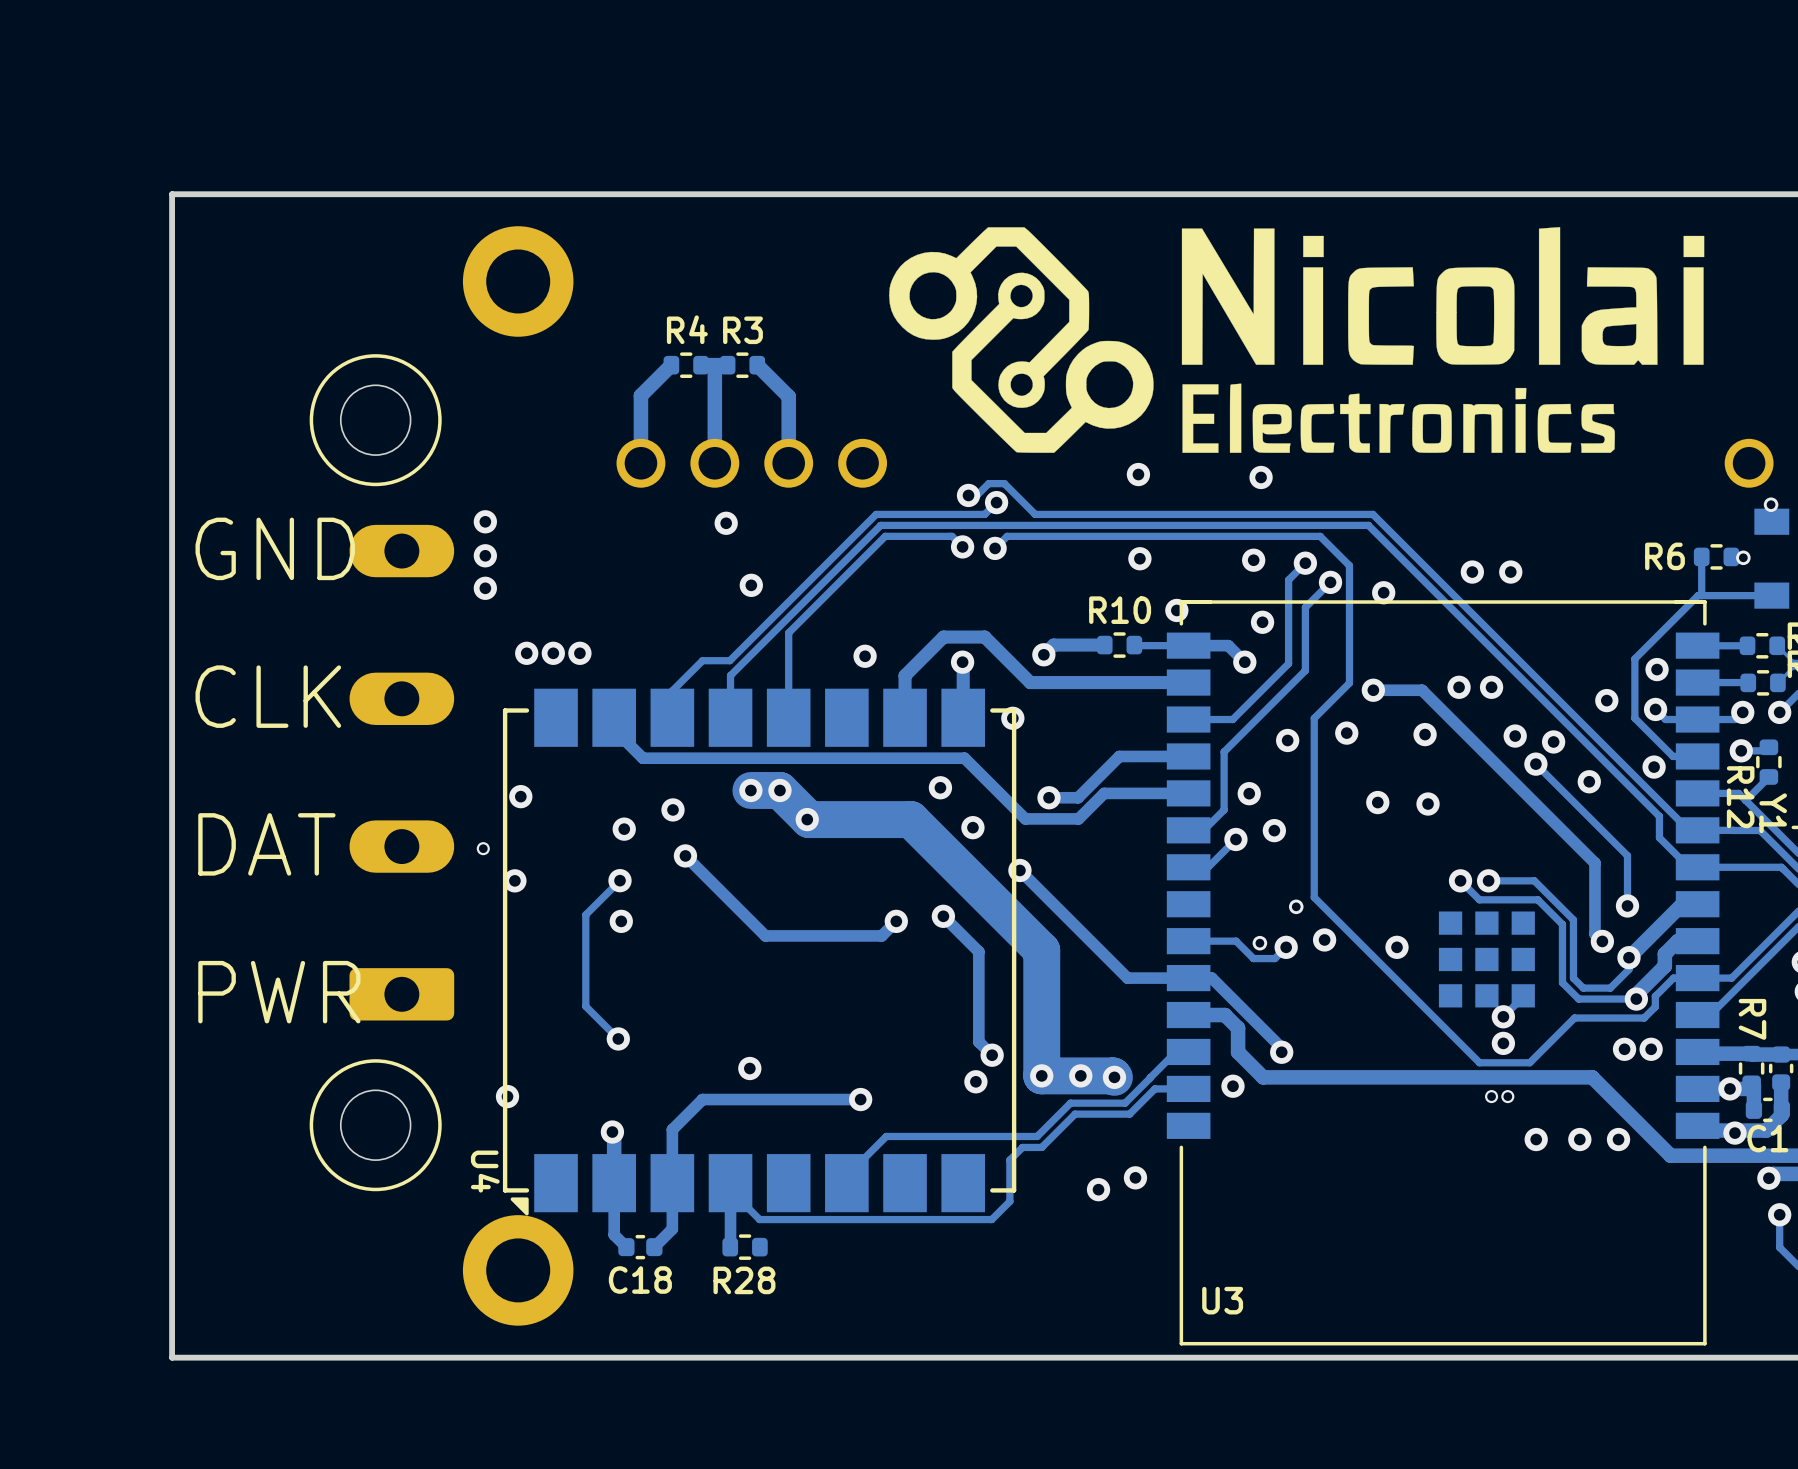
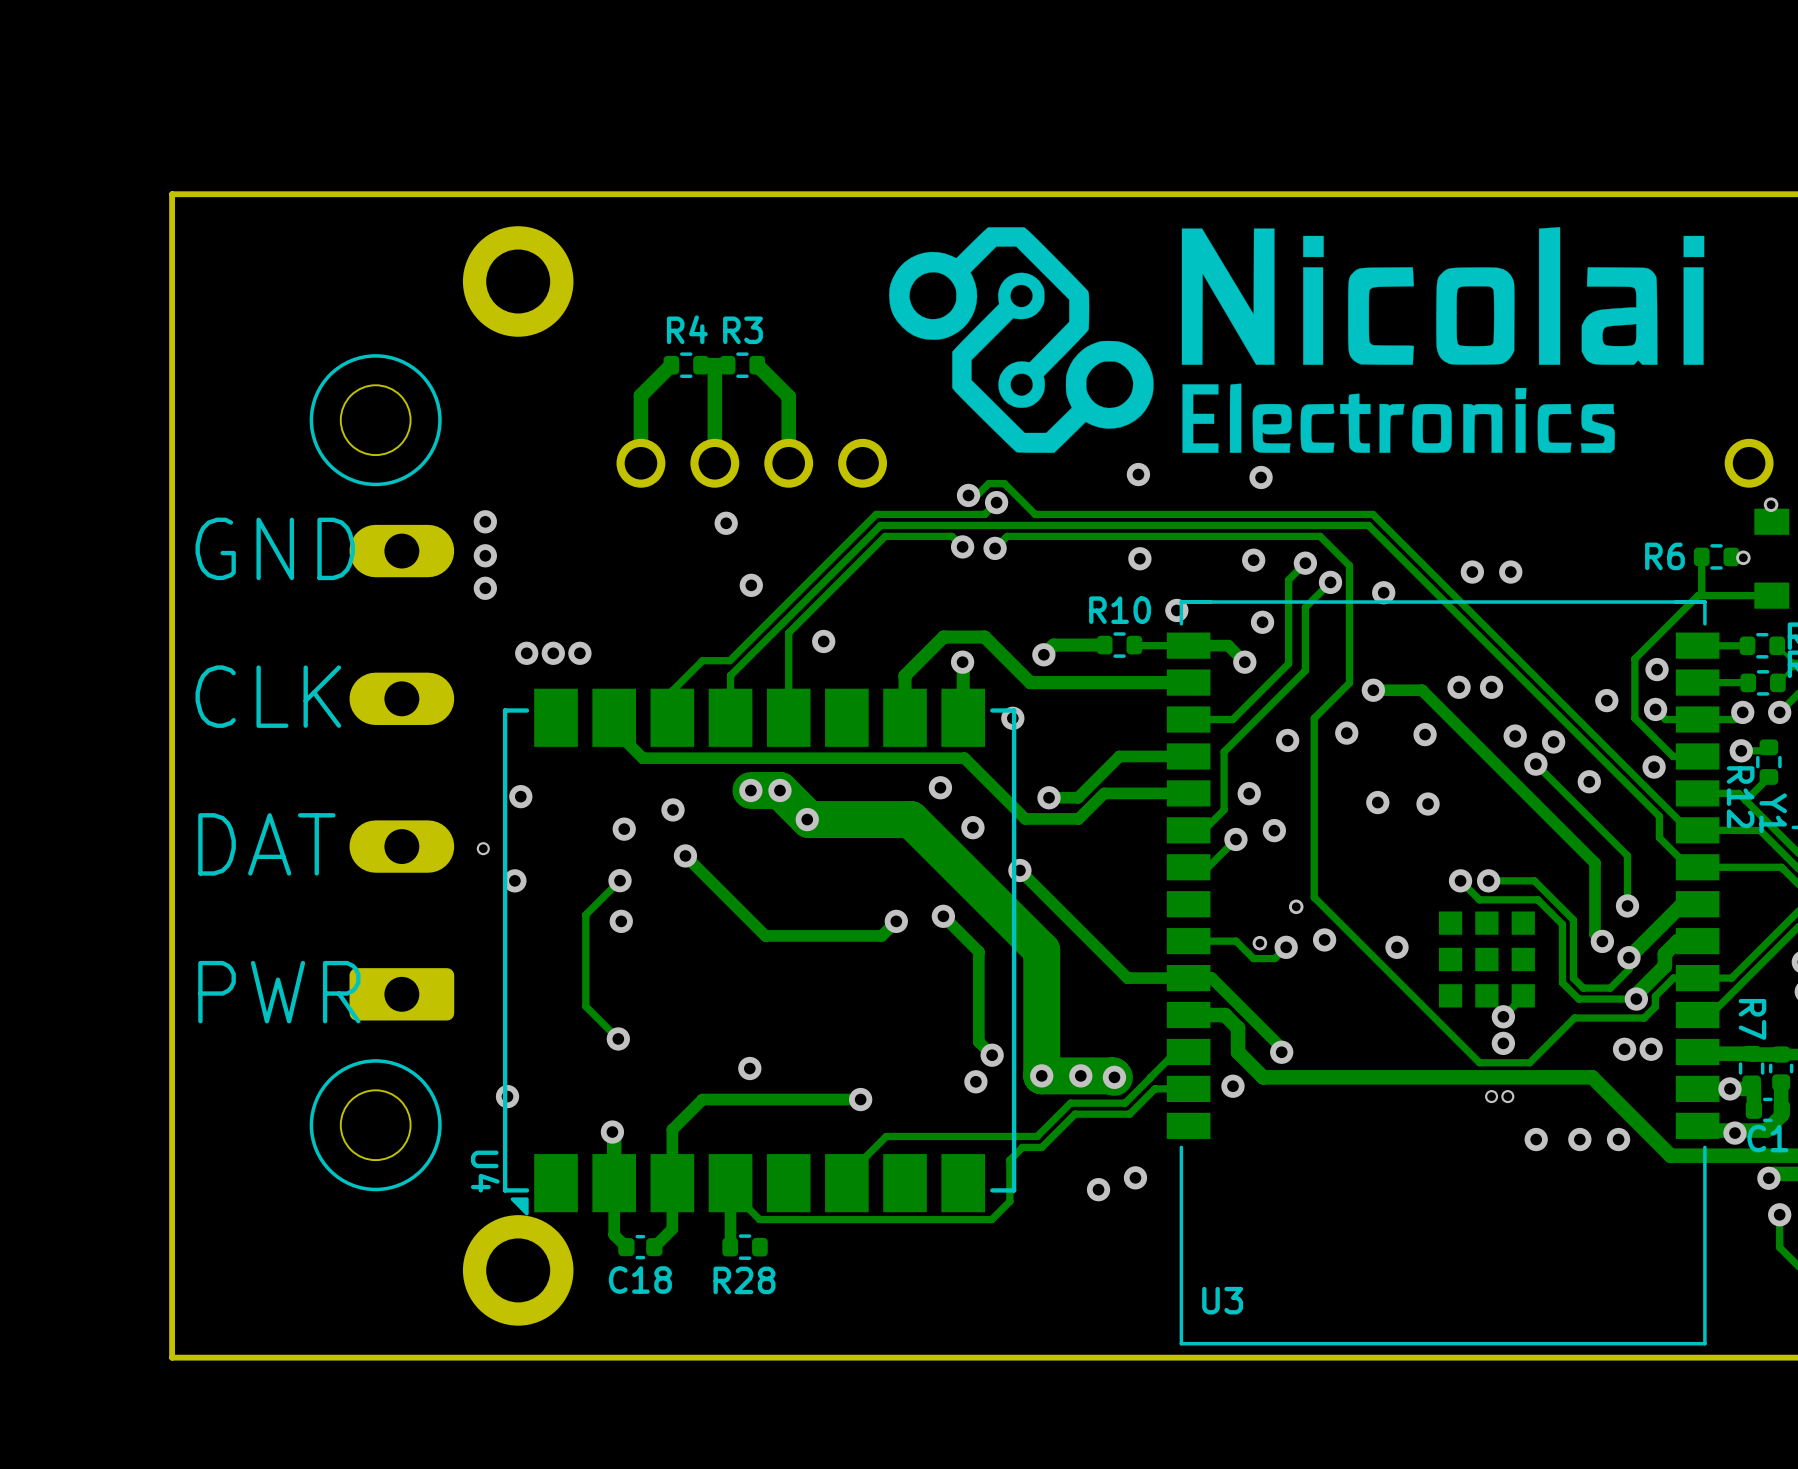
via position: (865, 656) -> (823, 641)

